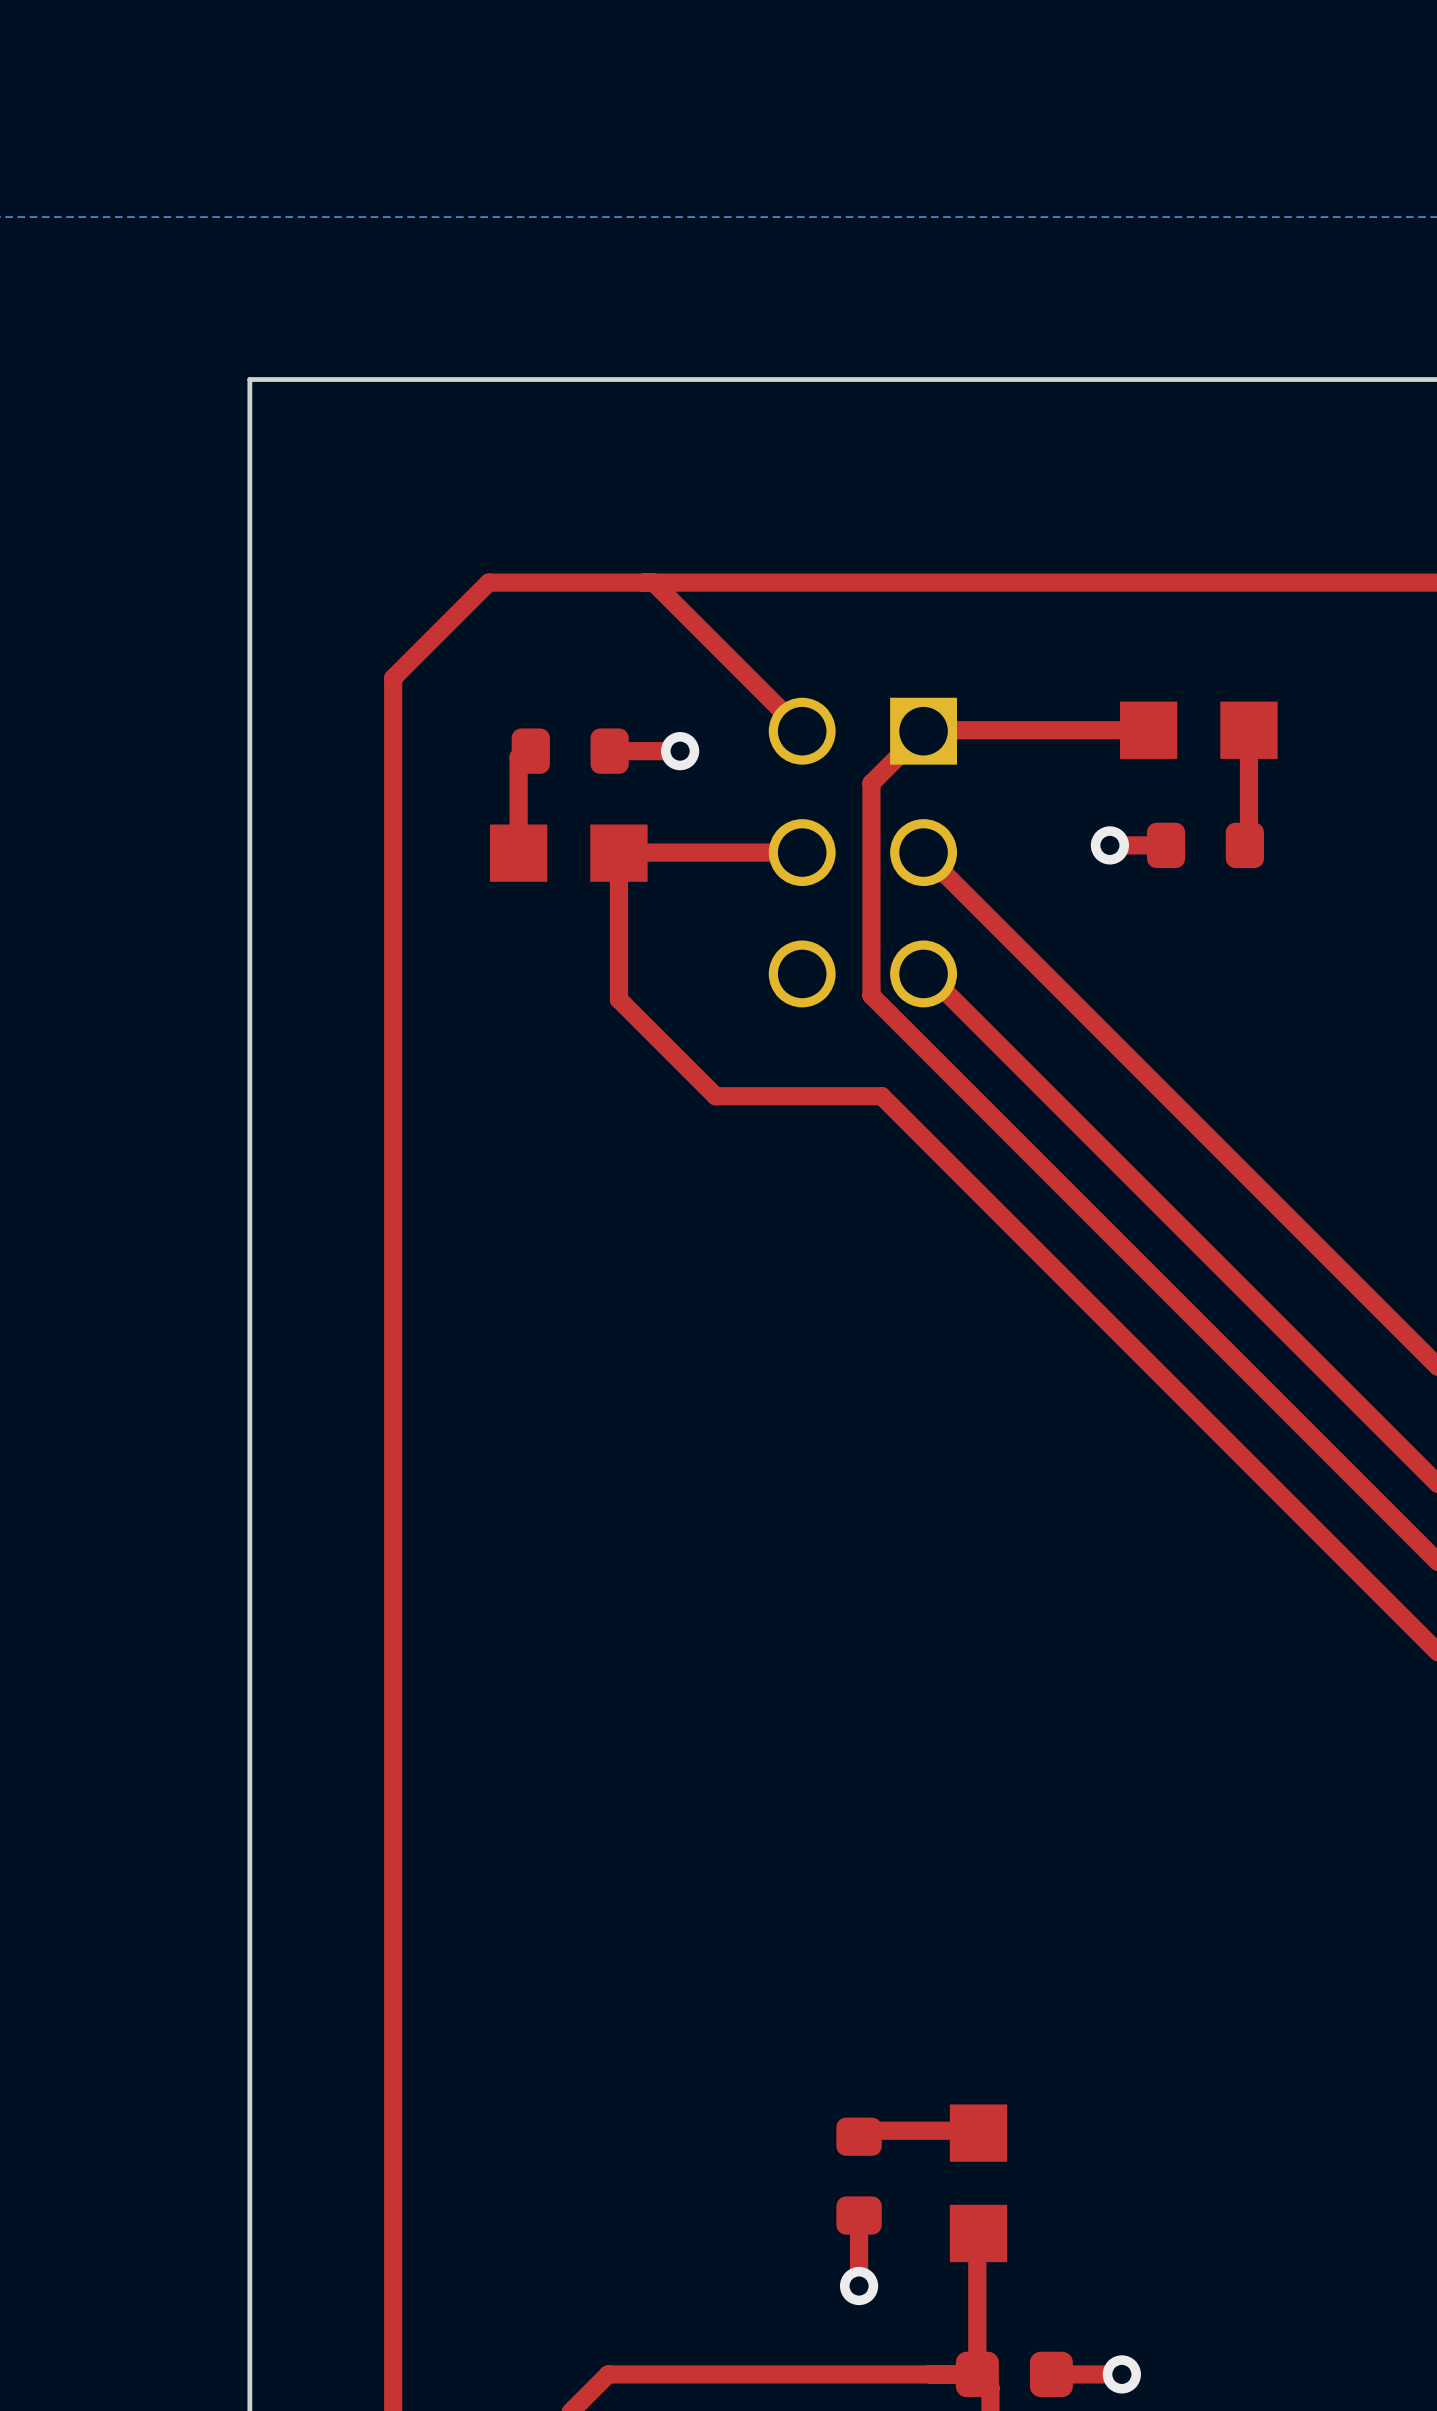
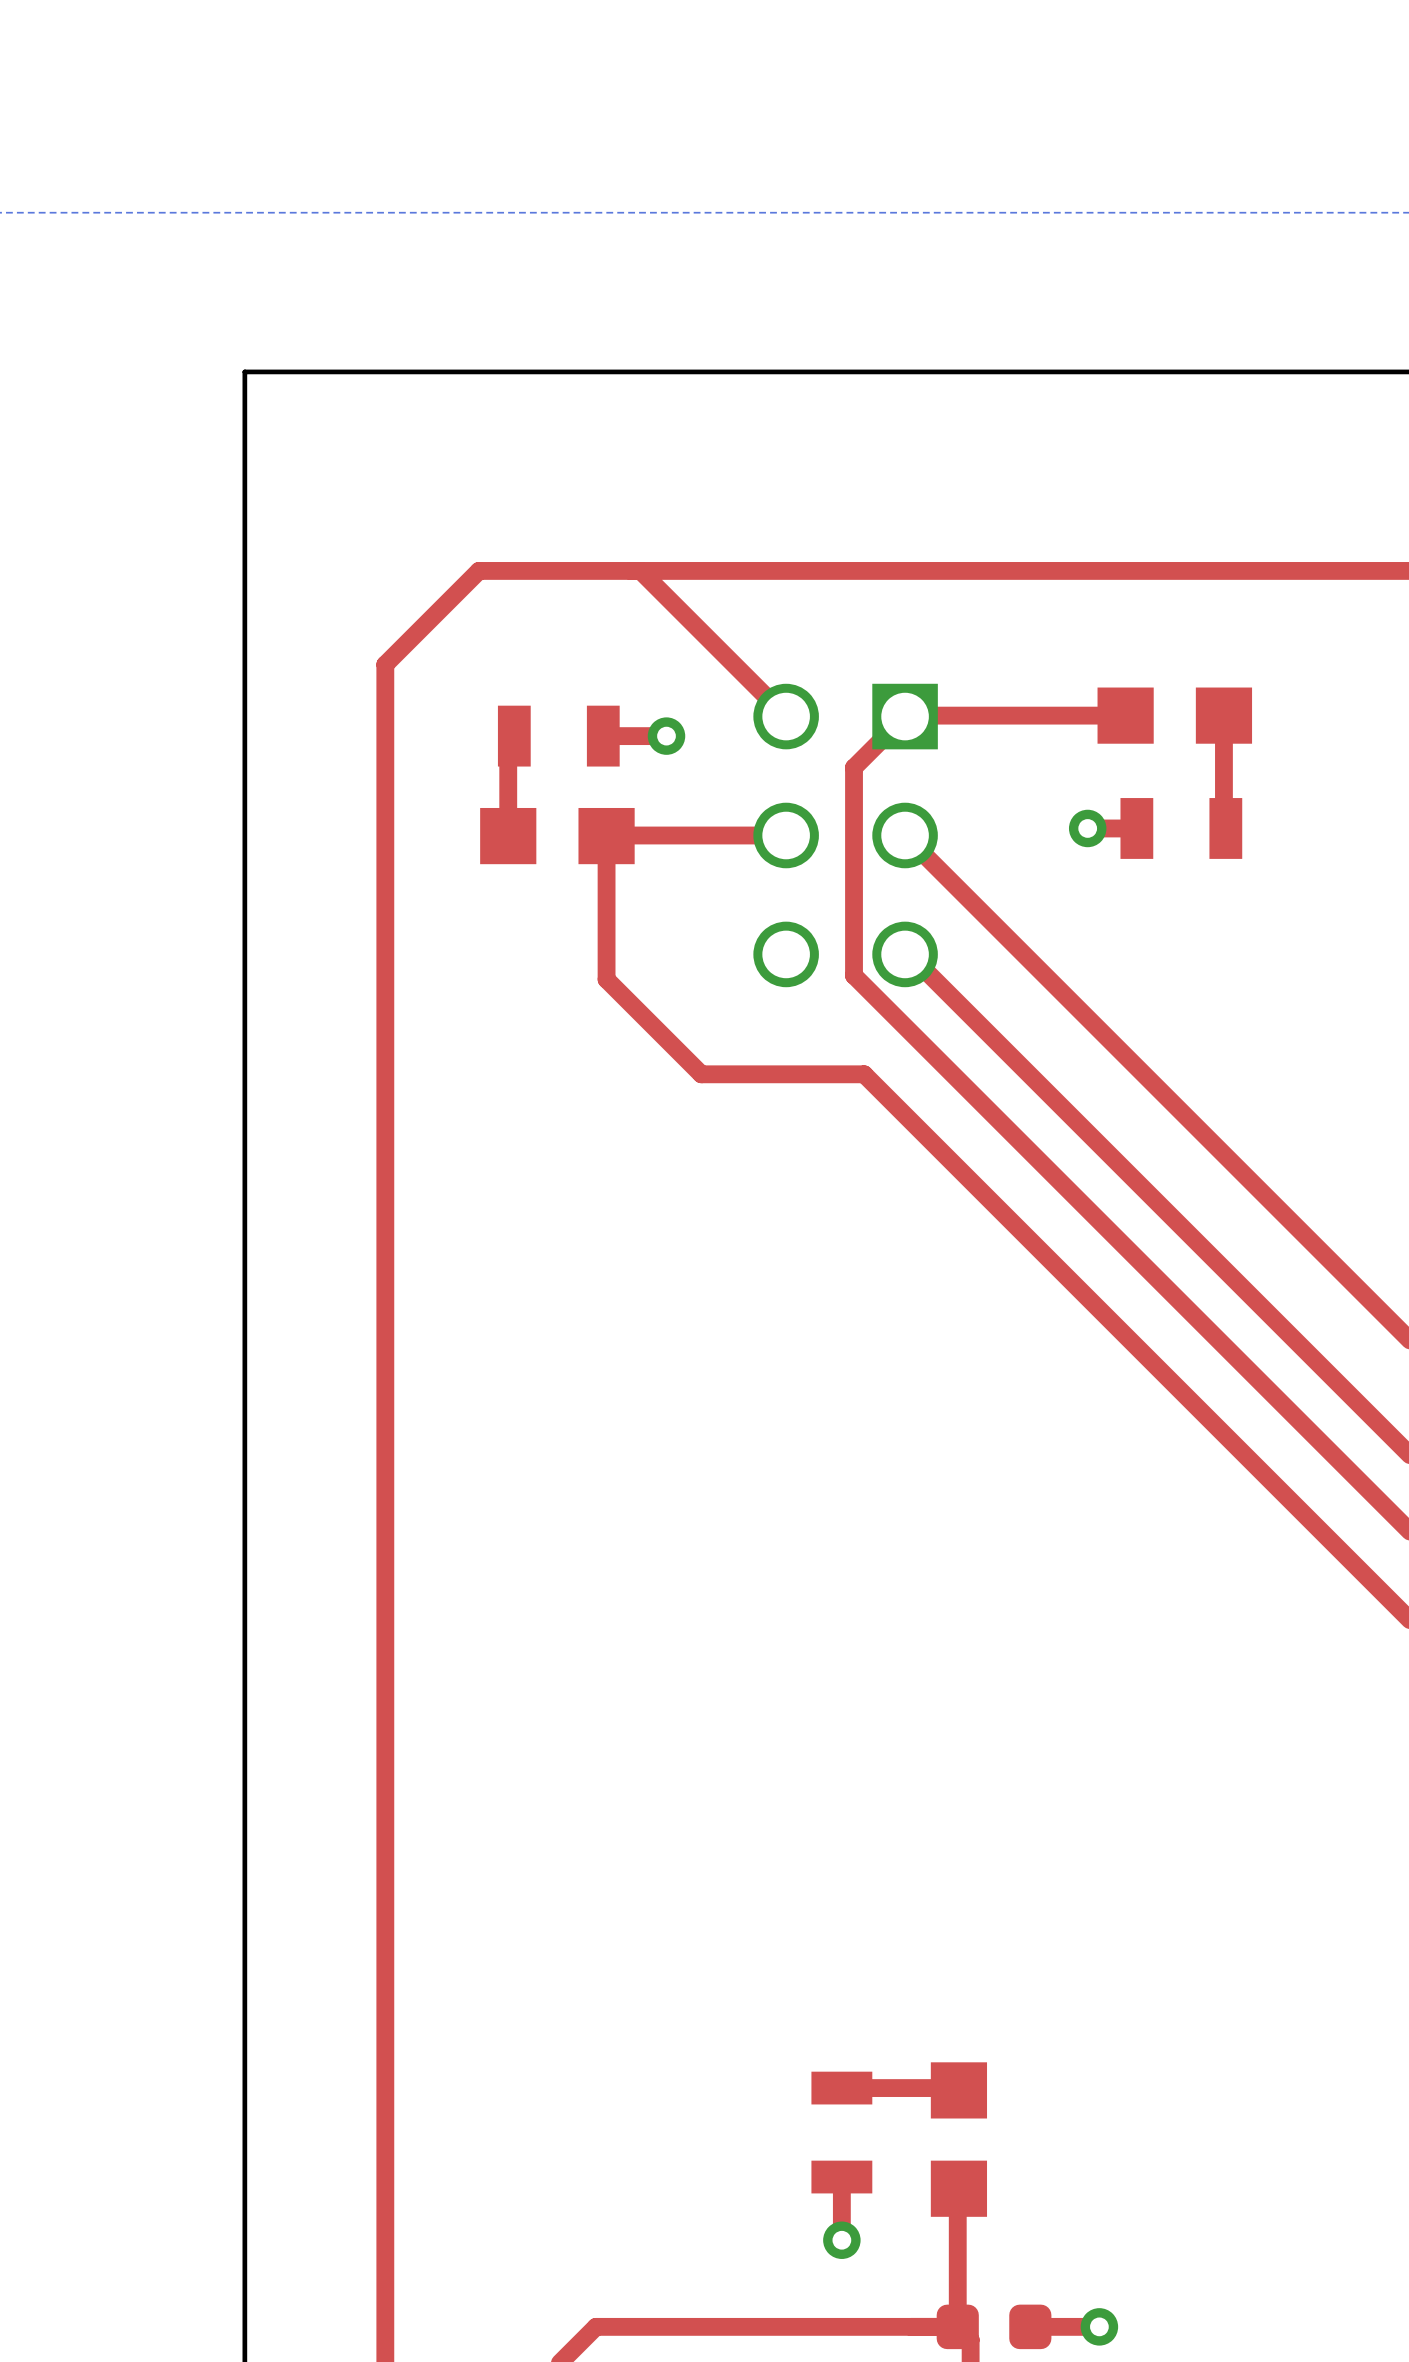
part footprint: [511, 728, 629, 774] -> [497, 705, 620, 767]
part footprint: [1146, 822, 1265, 869] -> [1120, 798, 1243, 859]
part footprint: [836, 2117, 882, 2235] -> [811, 2071, 873, 2194]

